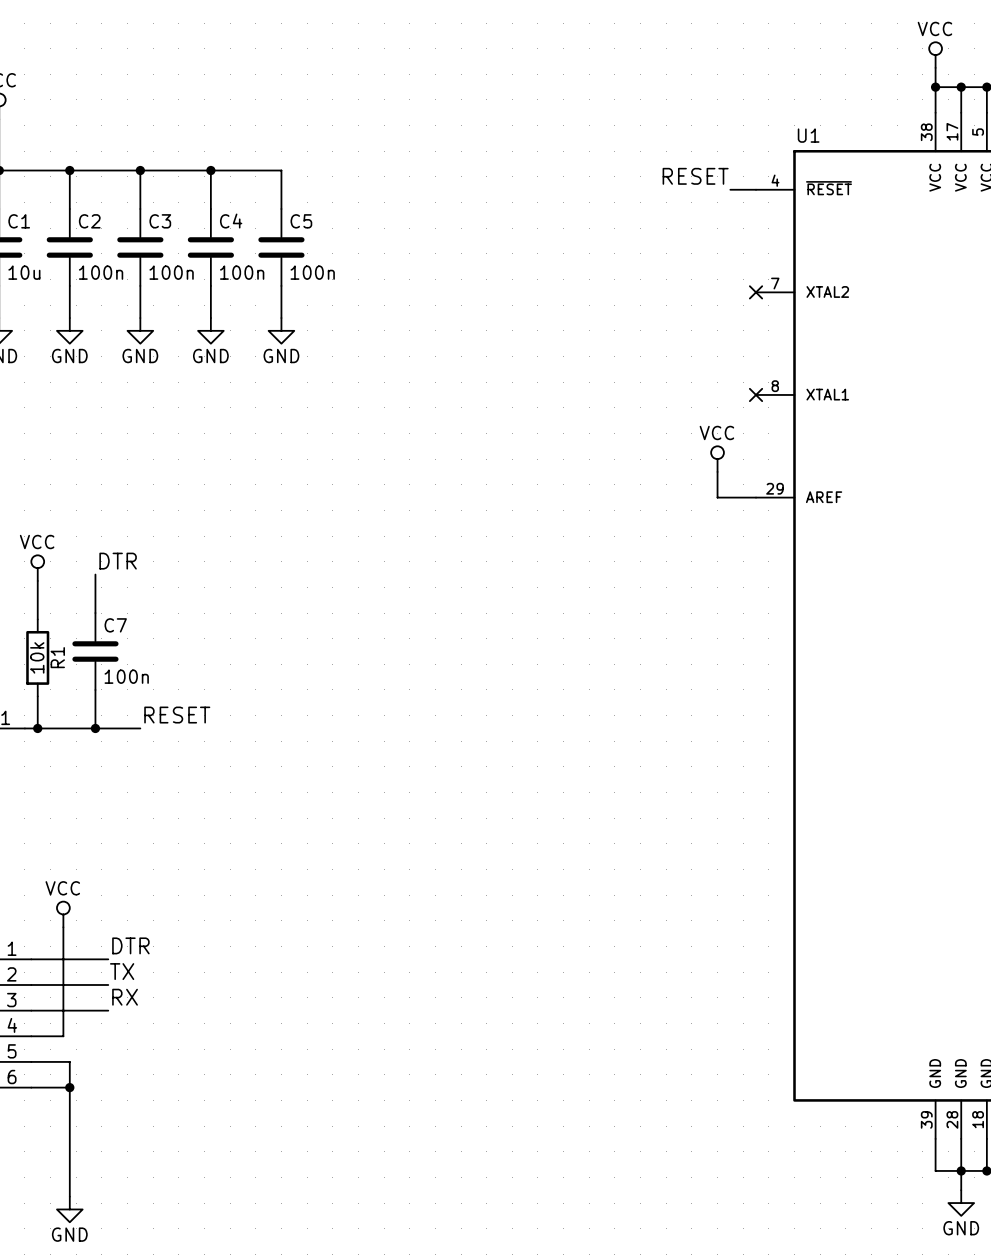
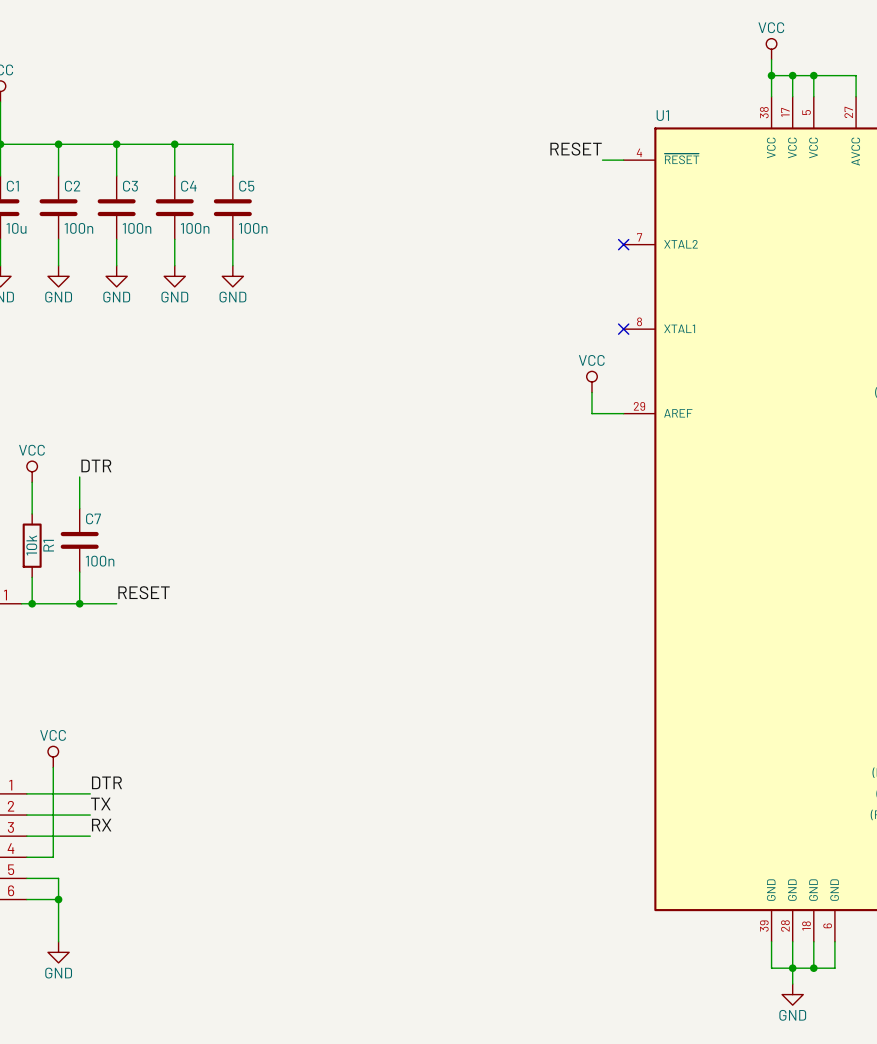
wire: (69, 1138) (69, 1196) -> none
power symbol position: GND (69, 1209) -> GND (58, 952)

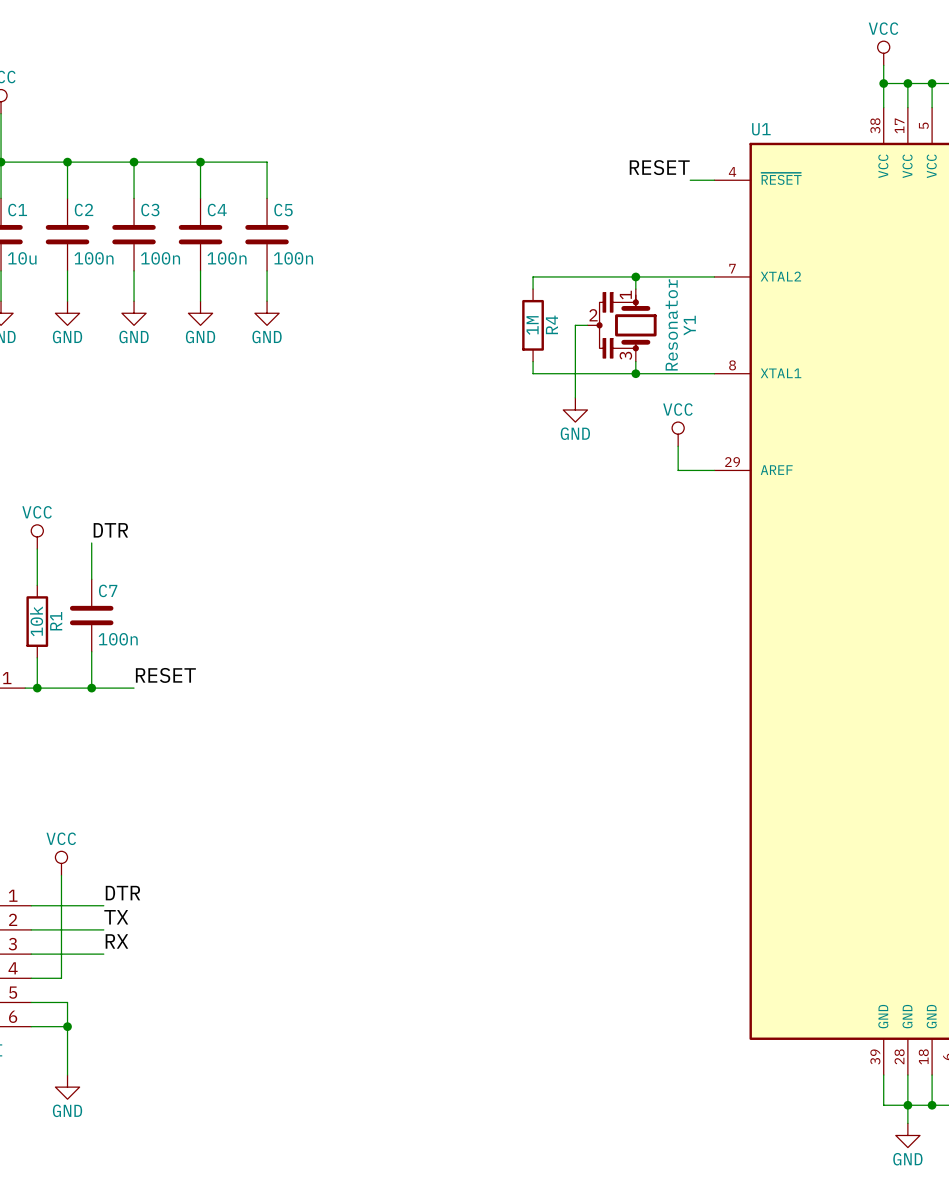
wire: none -> (635, 276) (635, 289)
junction: none -> (635, 276)
wire: none -> (714, 276) (533, 276) (533, 289)
no-connect mark: (623, 244) -> none
R4: none -> 1M (533, 325)
wire: none -> (587, 325) (575, 325) (575, 397)
Y1: none -> Resonator (622, 325)
wire: none -> (533, 361) (533, 373) (714, 373)
wire: none -> (635, 361) (635, 373)
junction: none -> (635, 373)
no-connect mark: (623, 329) -> none
power symbol: none -> GND (575, 409)

